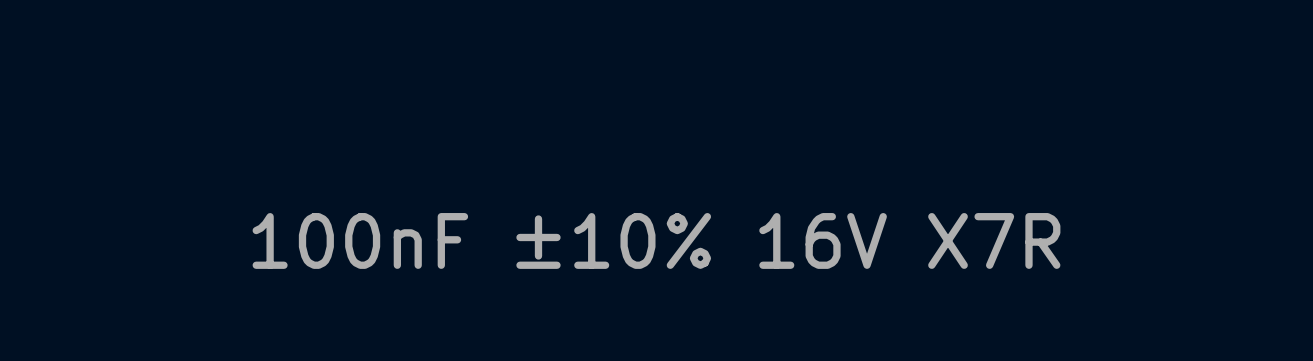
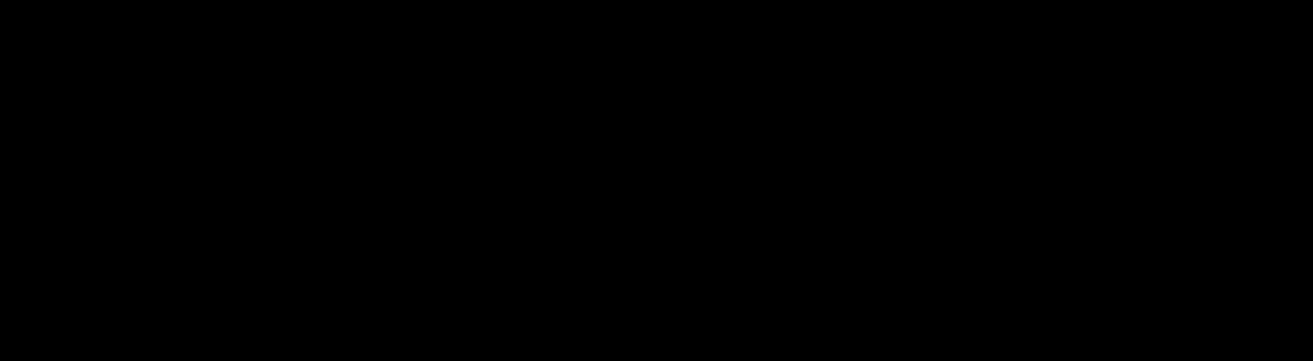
part value: 100nF ±10% 16V X7R (656, 240) -> none

